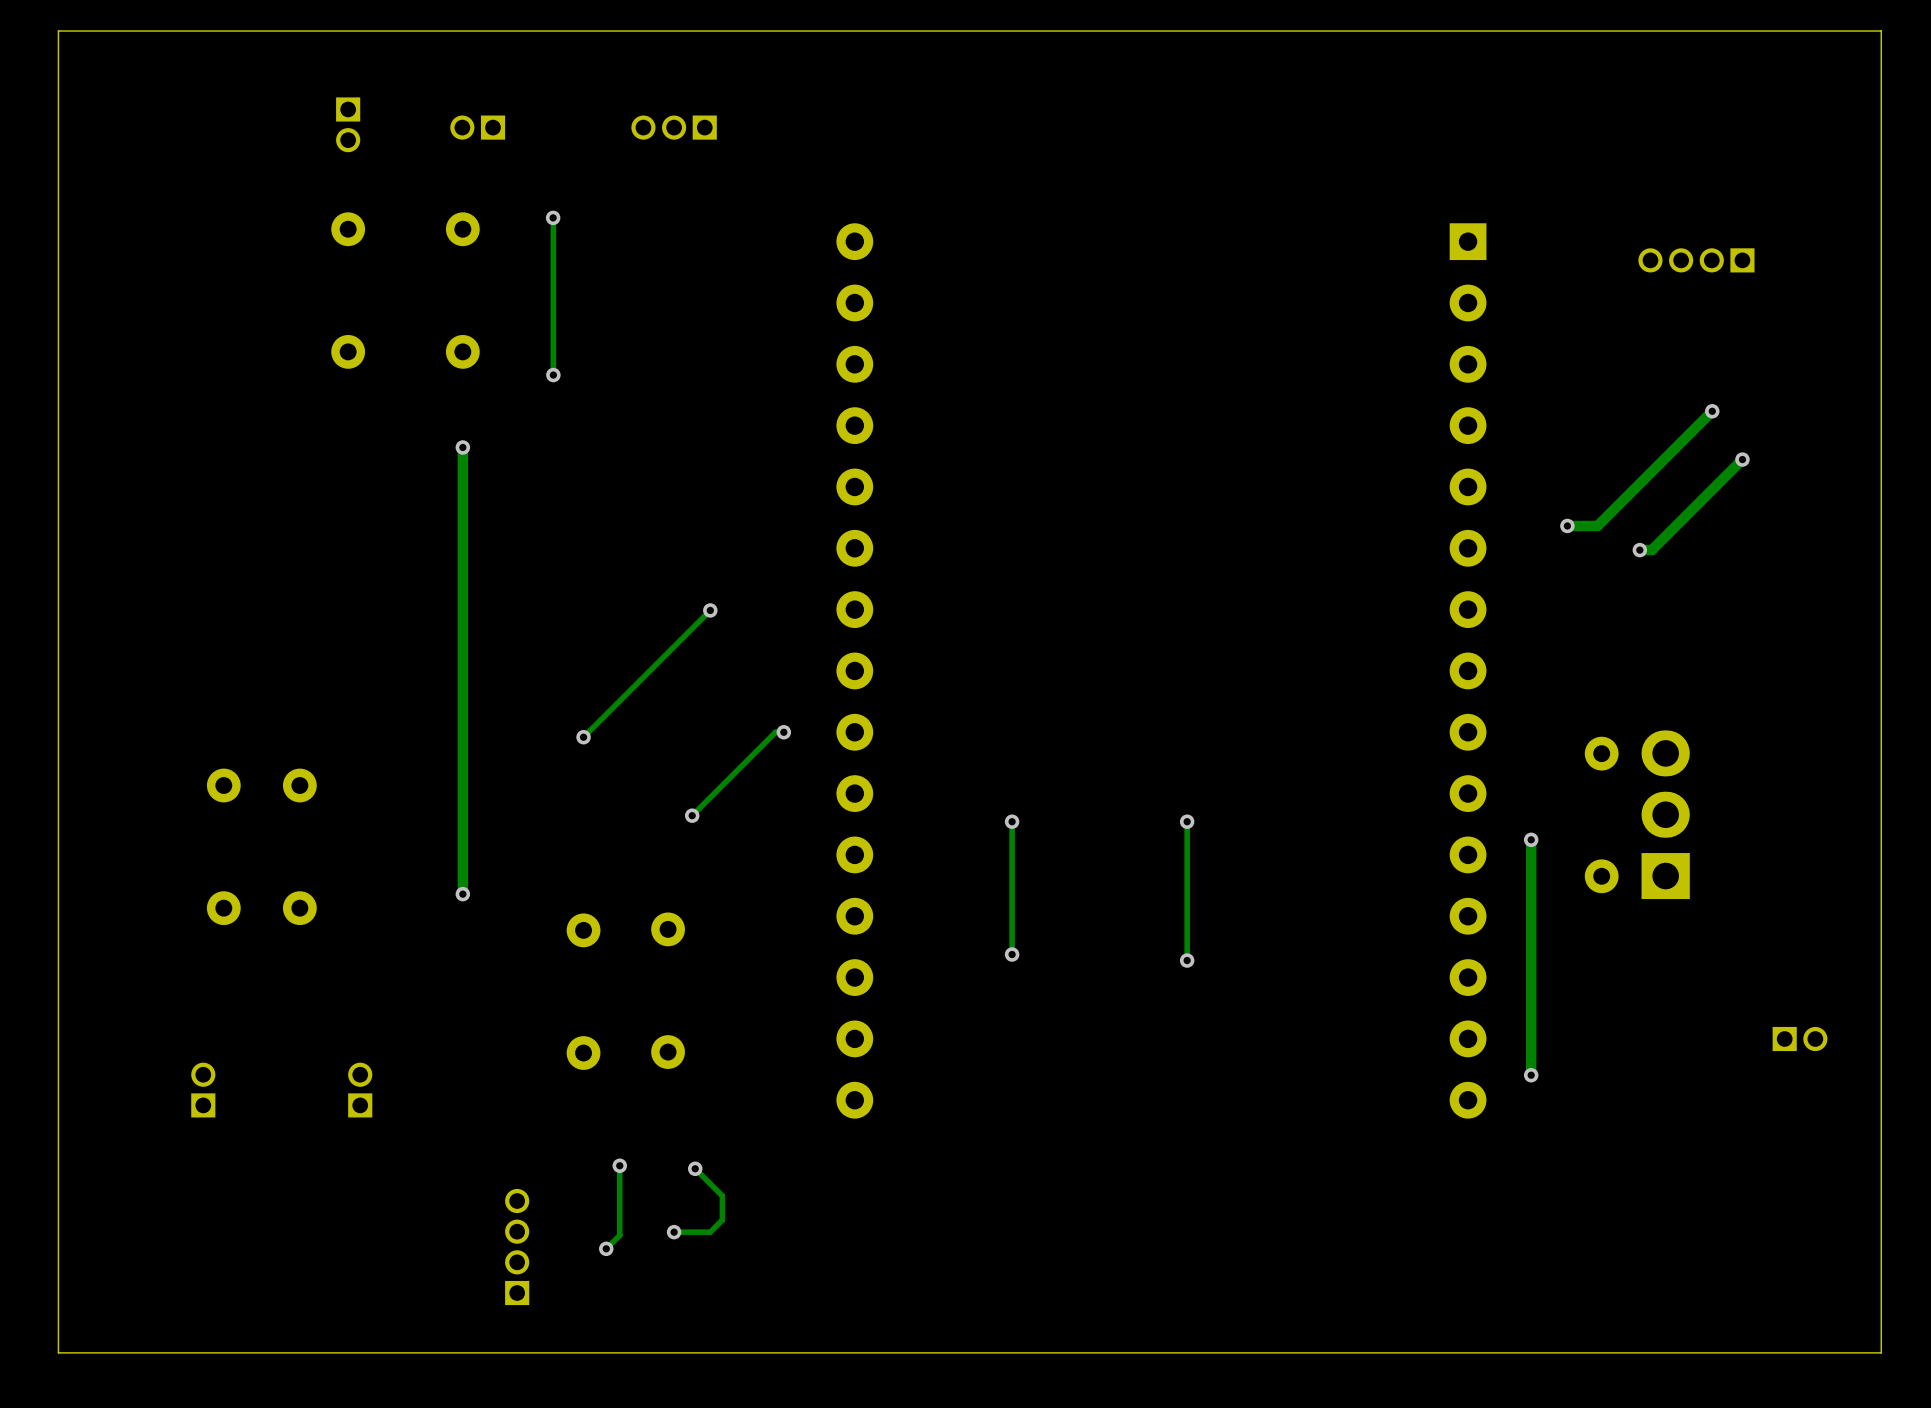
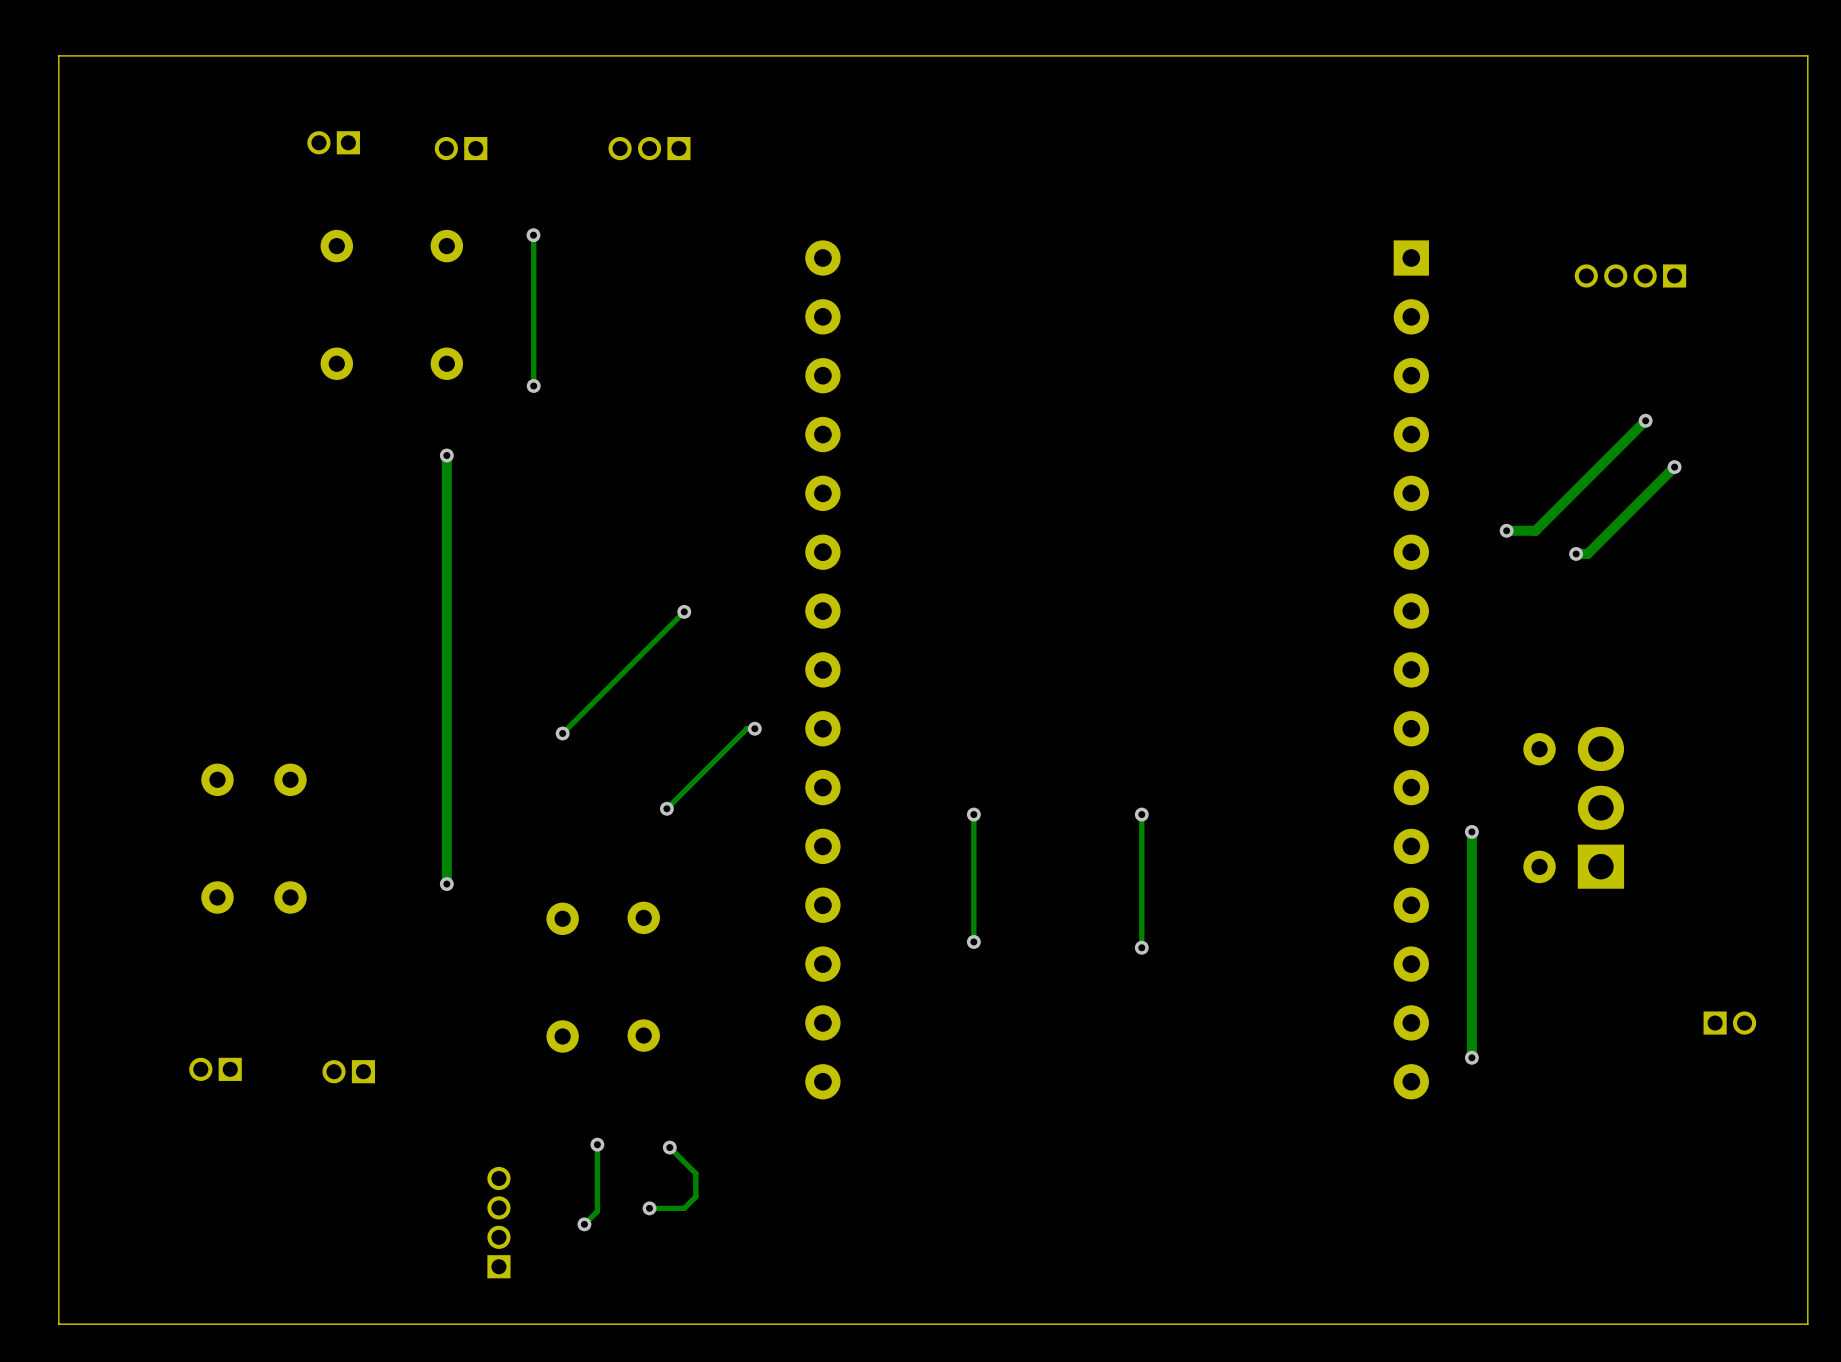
part rotation: 0° (348, 124) -> 90° clockwise (333, 142)
part rotation: 0° (203, 1090) -> 90° counterclockwise (215, 1069)
part rotation: 0° (360, 1090) -> 90° counterclockwise (348, 1071)

